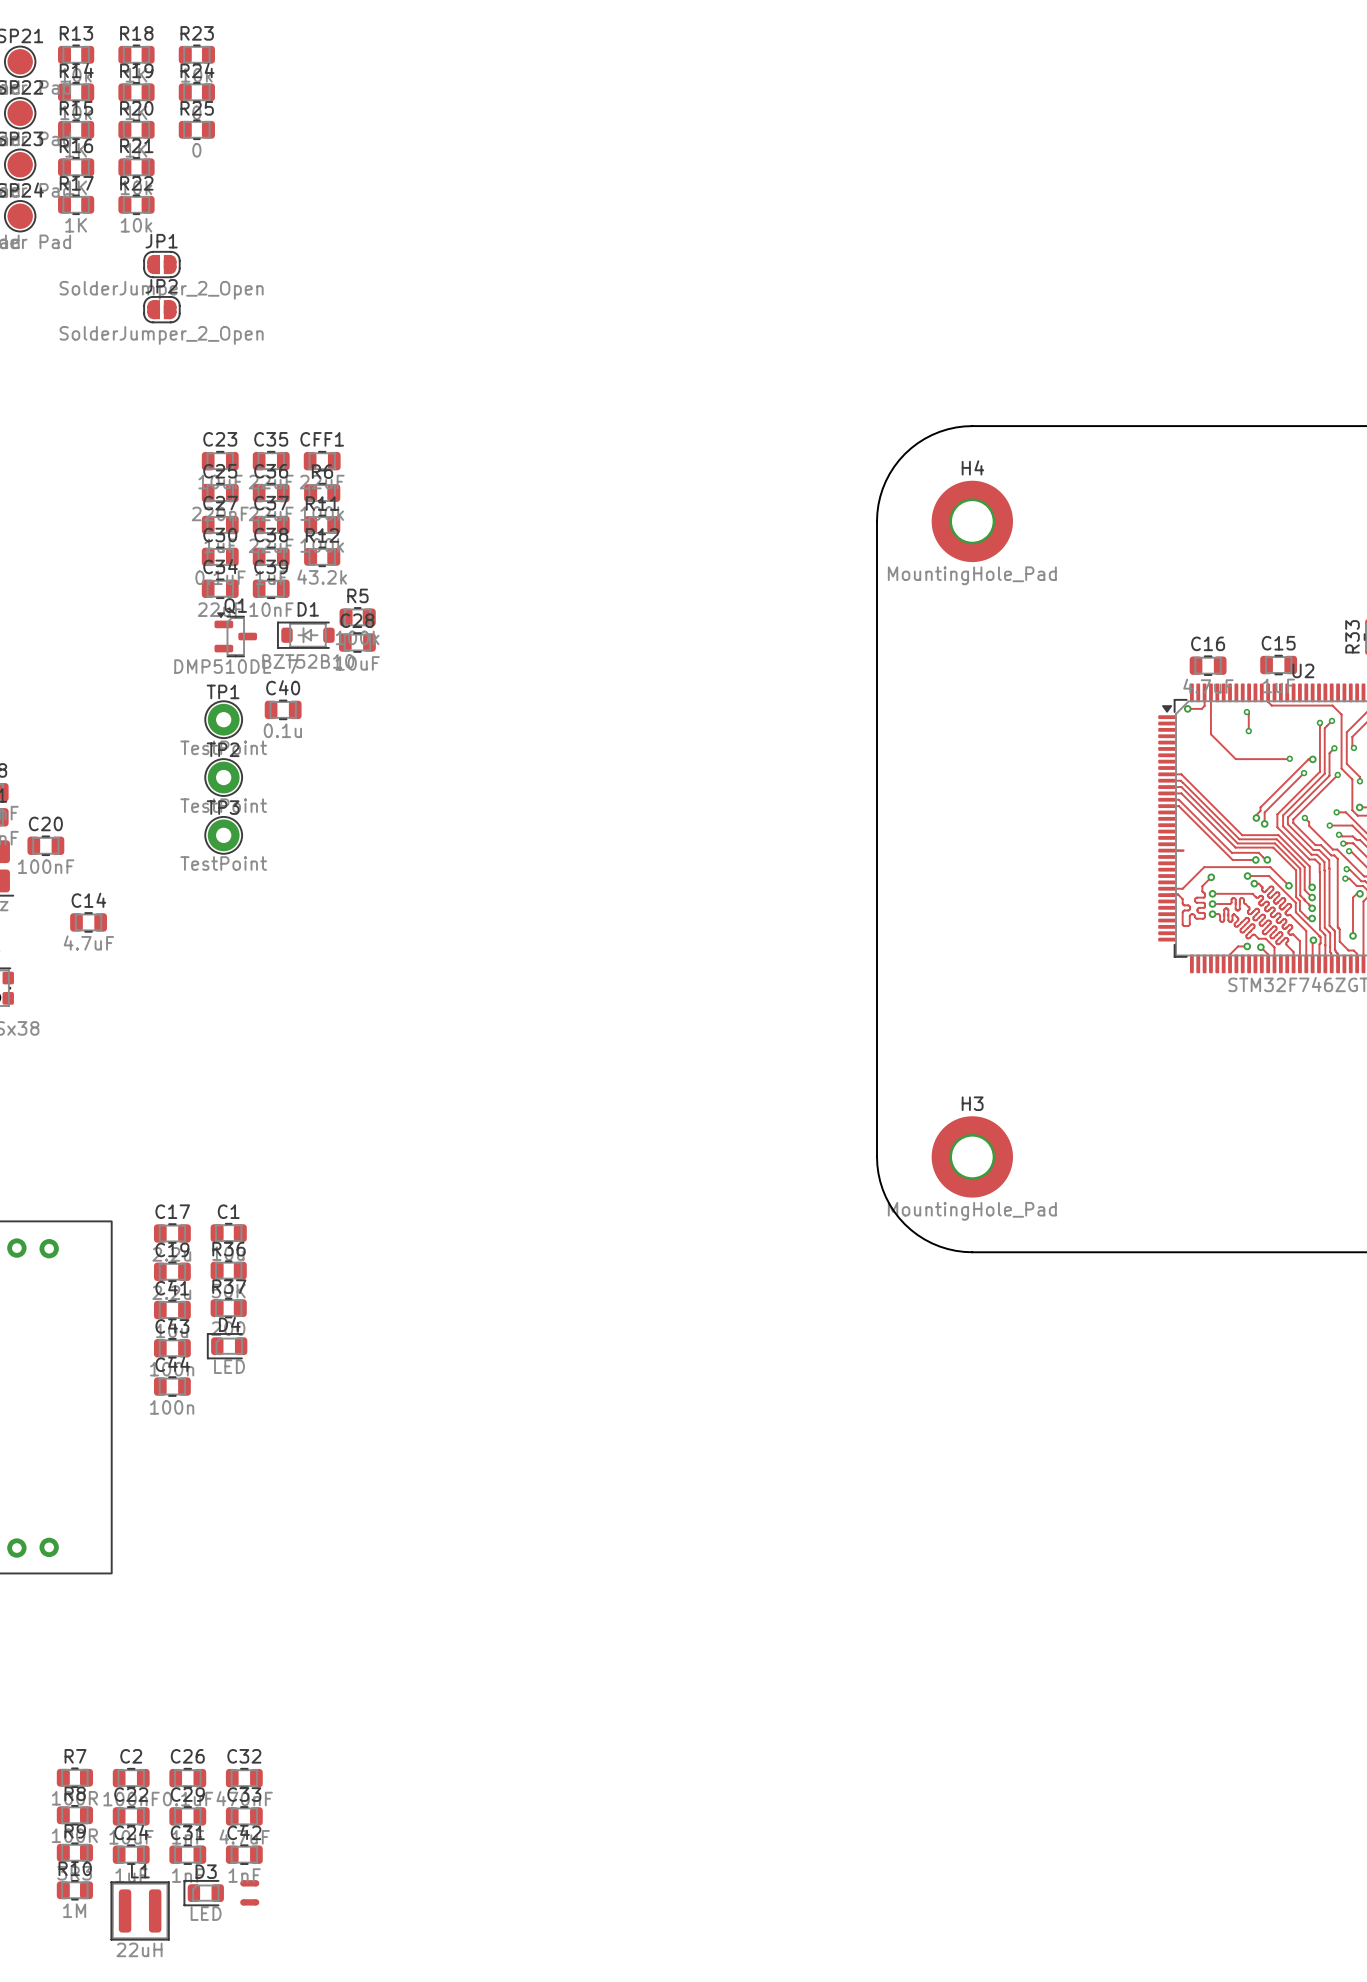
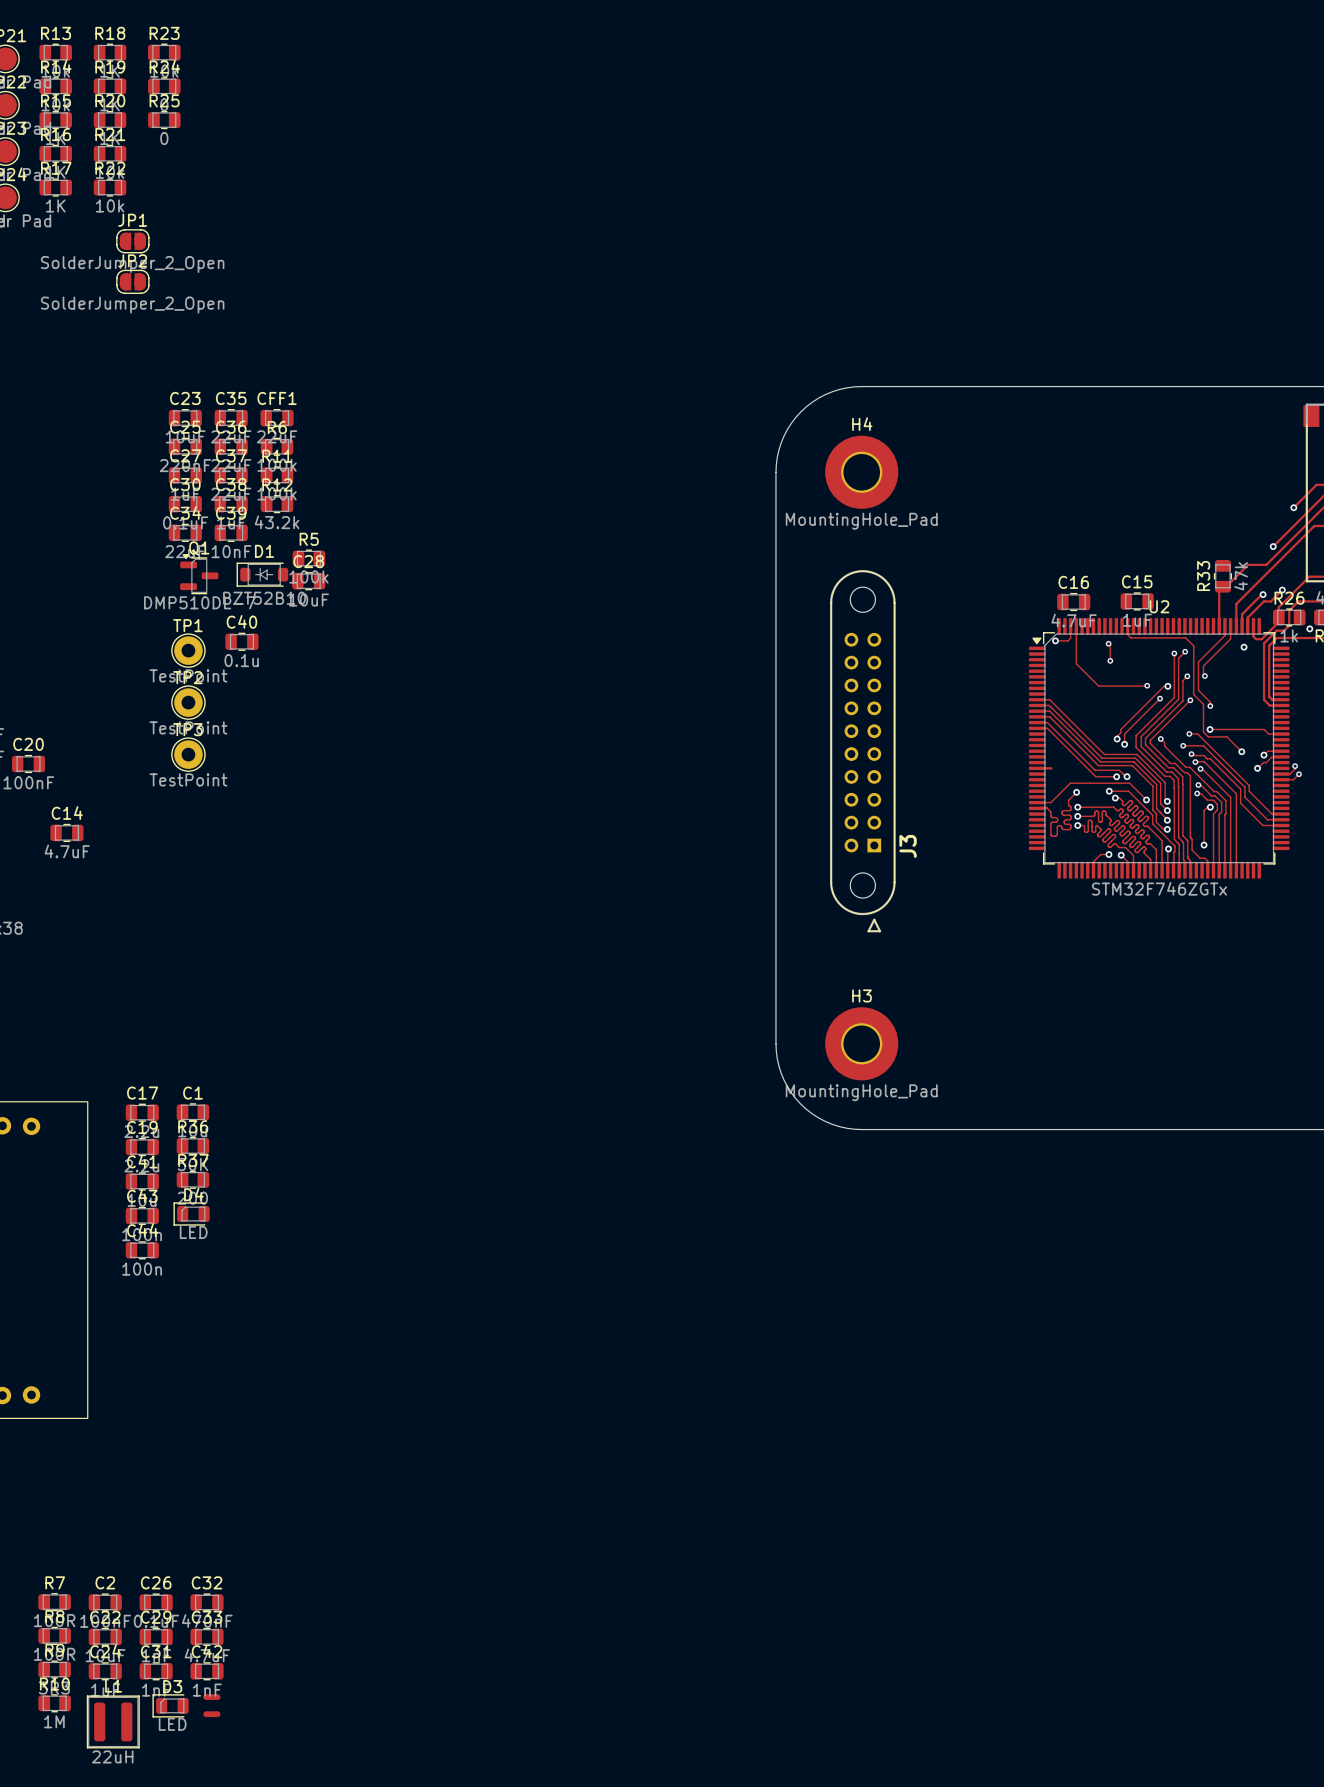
J3: none -> (862, 751)

